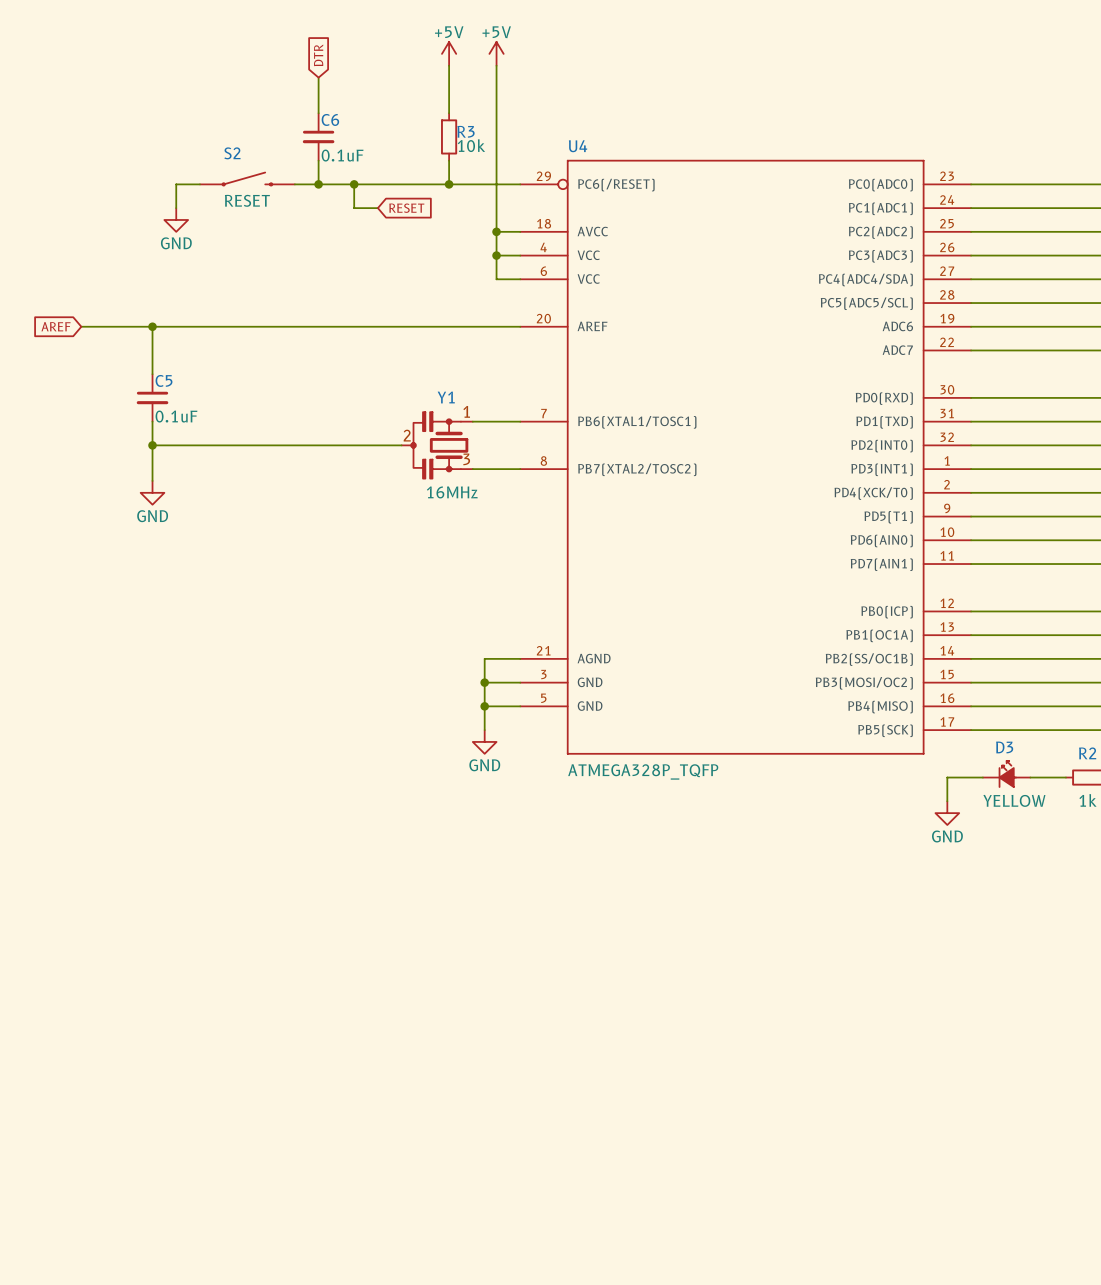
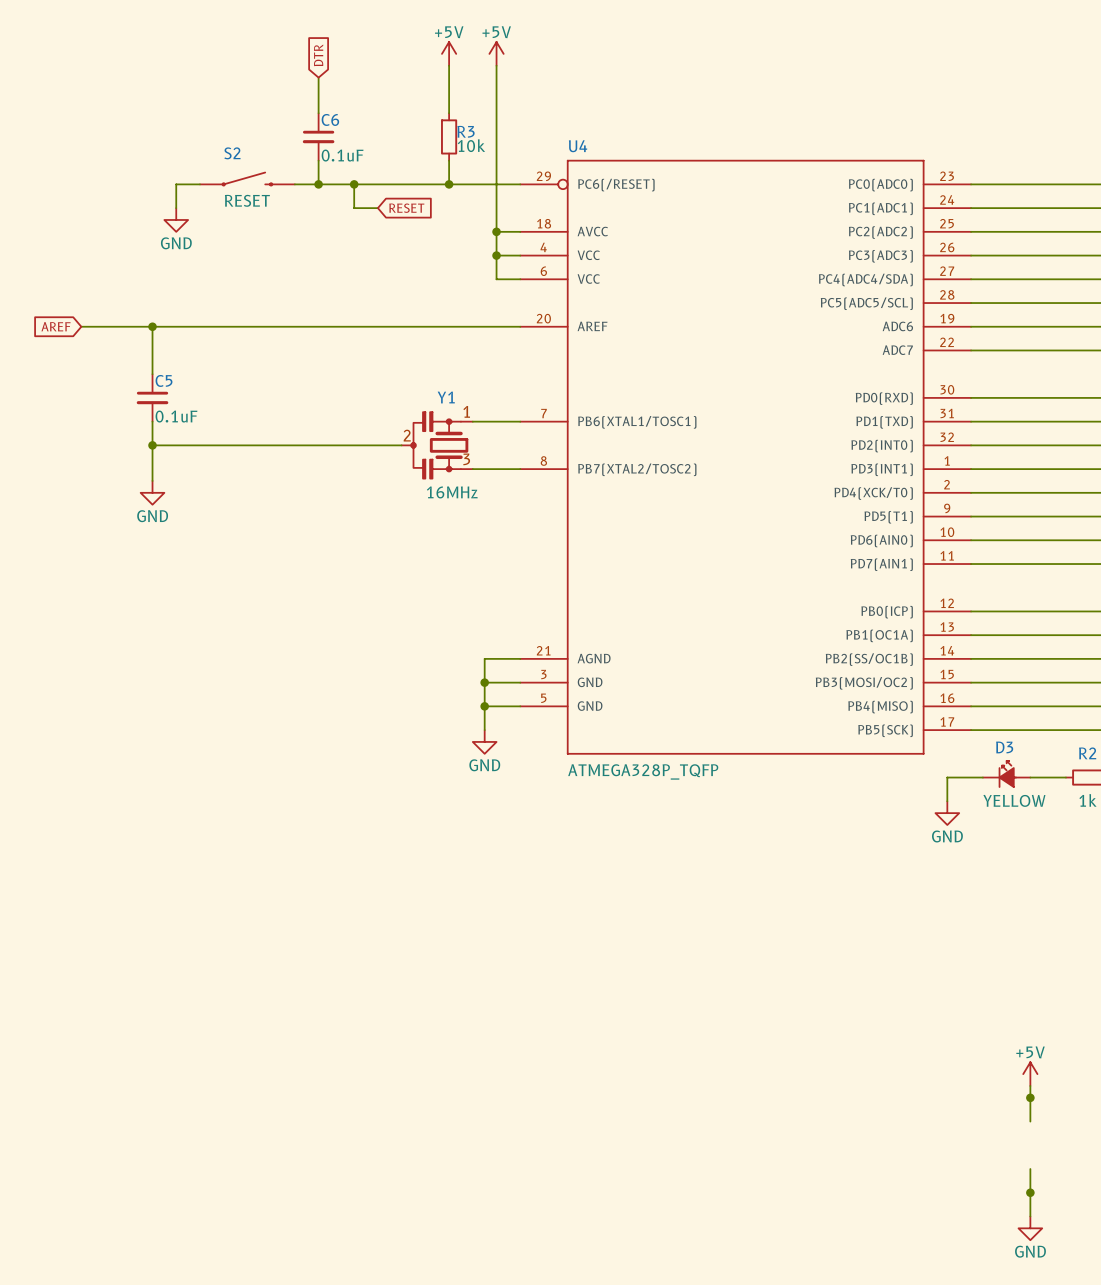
power symbol: none -> +5V (1030, 1074)
wire: none -> (1030, 1085) (1030, 1121)
junction: none -> (1030, 1097)
wire: none -> (1030, 1169) (1030, 1216)
junction: none -> (1030, 1192)
power symbol: none -> GND (1030, 1228)

